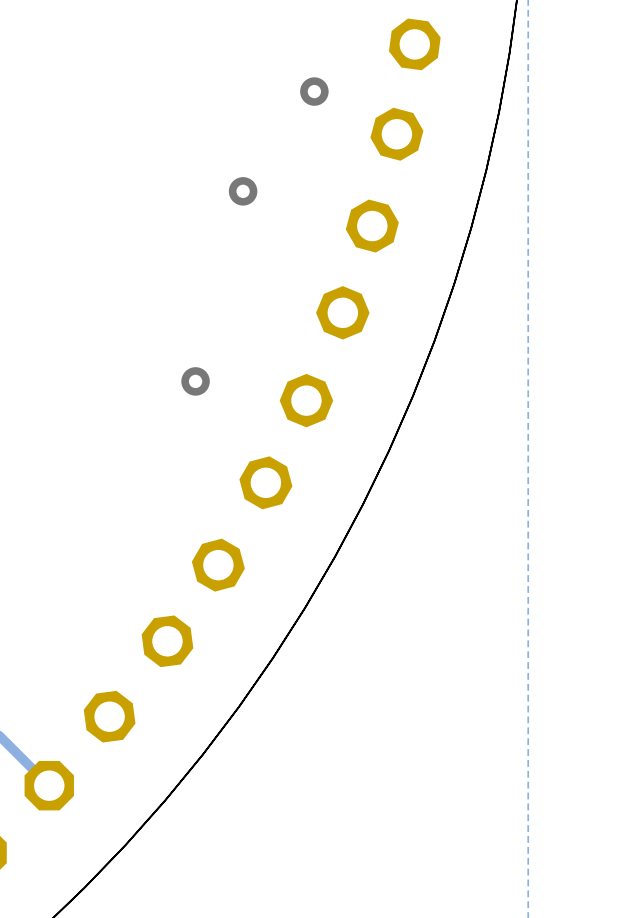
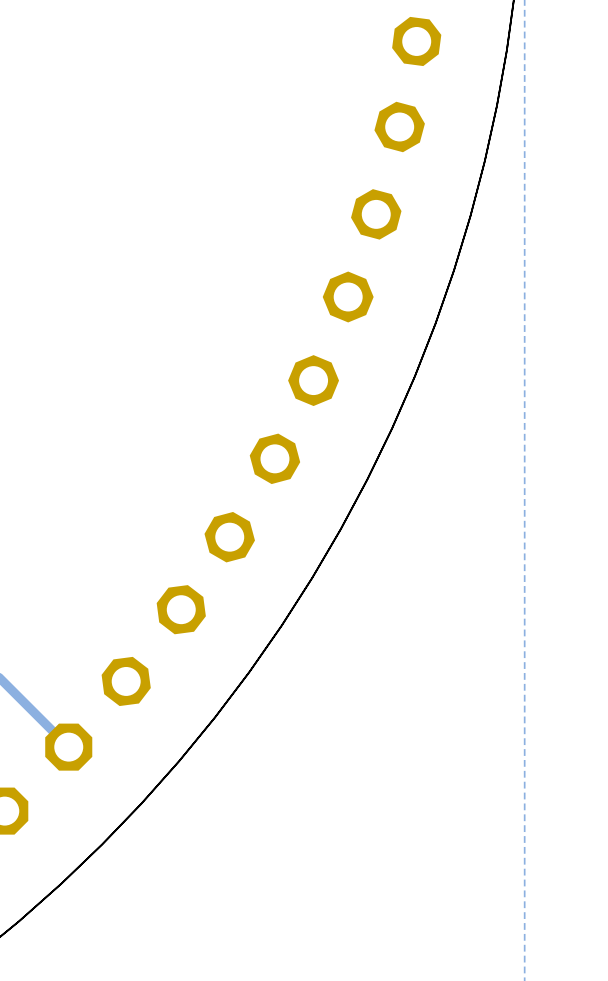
via: (314, 91) -> none
via: (243, 191) -> none
via: (195, 381) -> none

